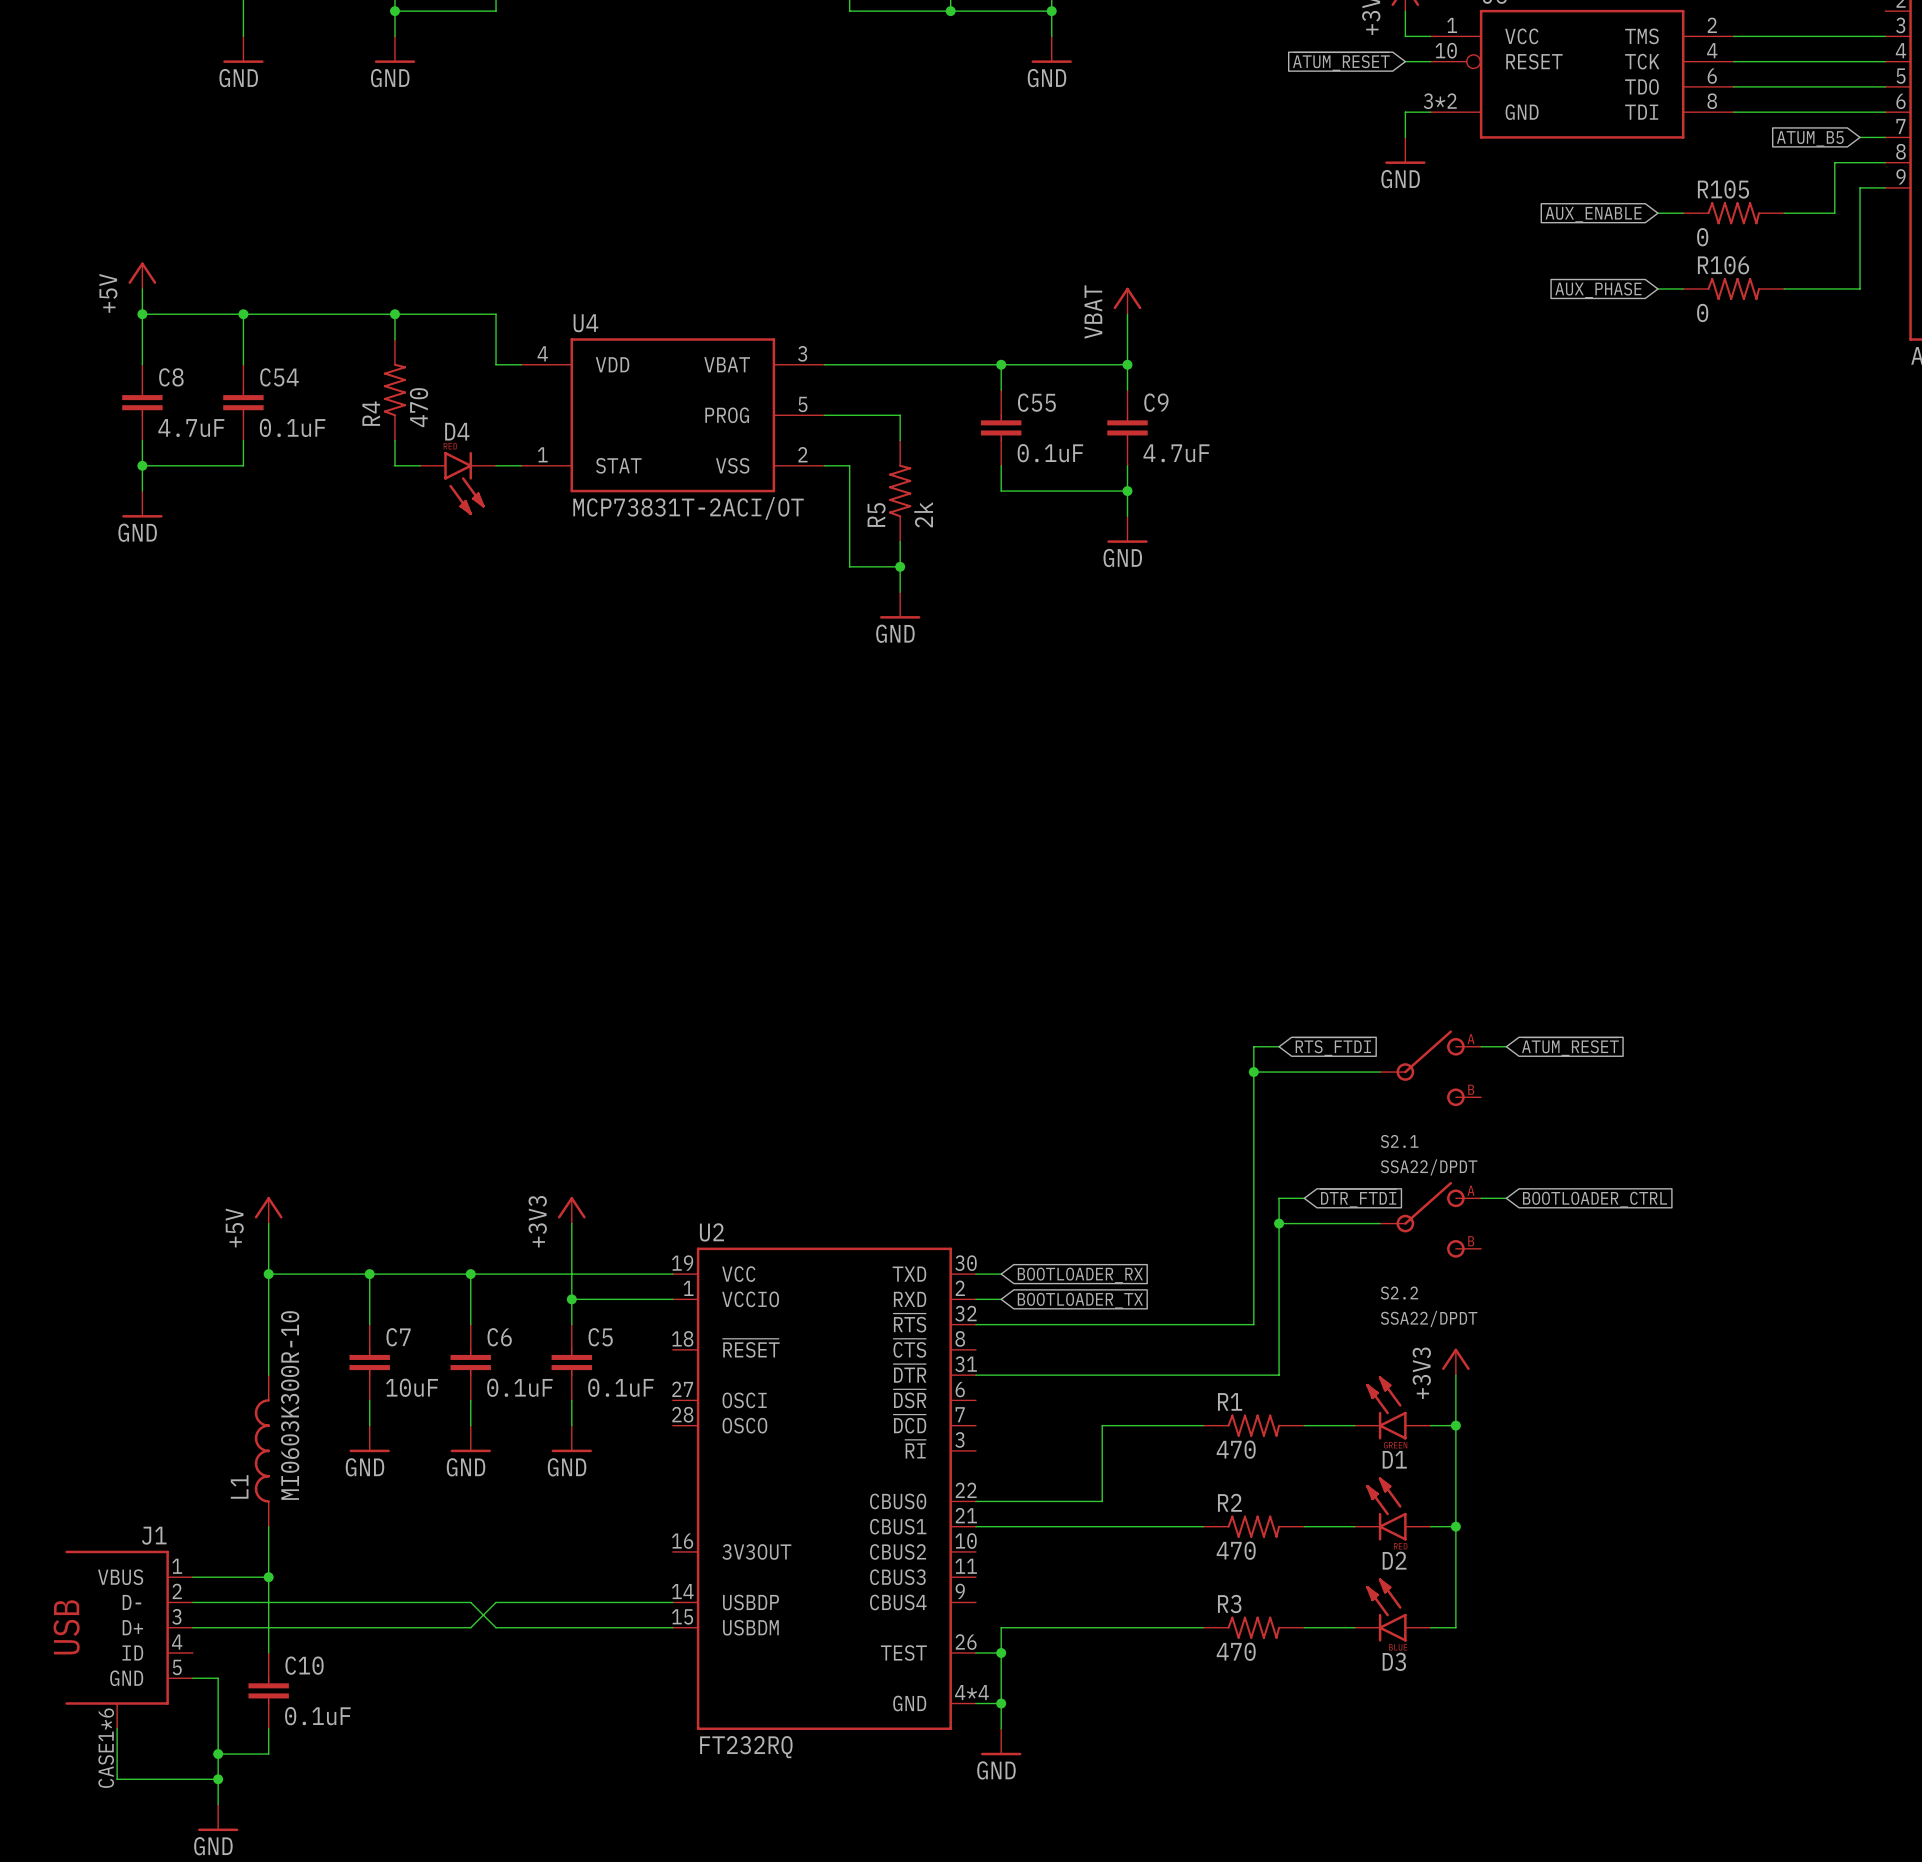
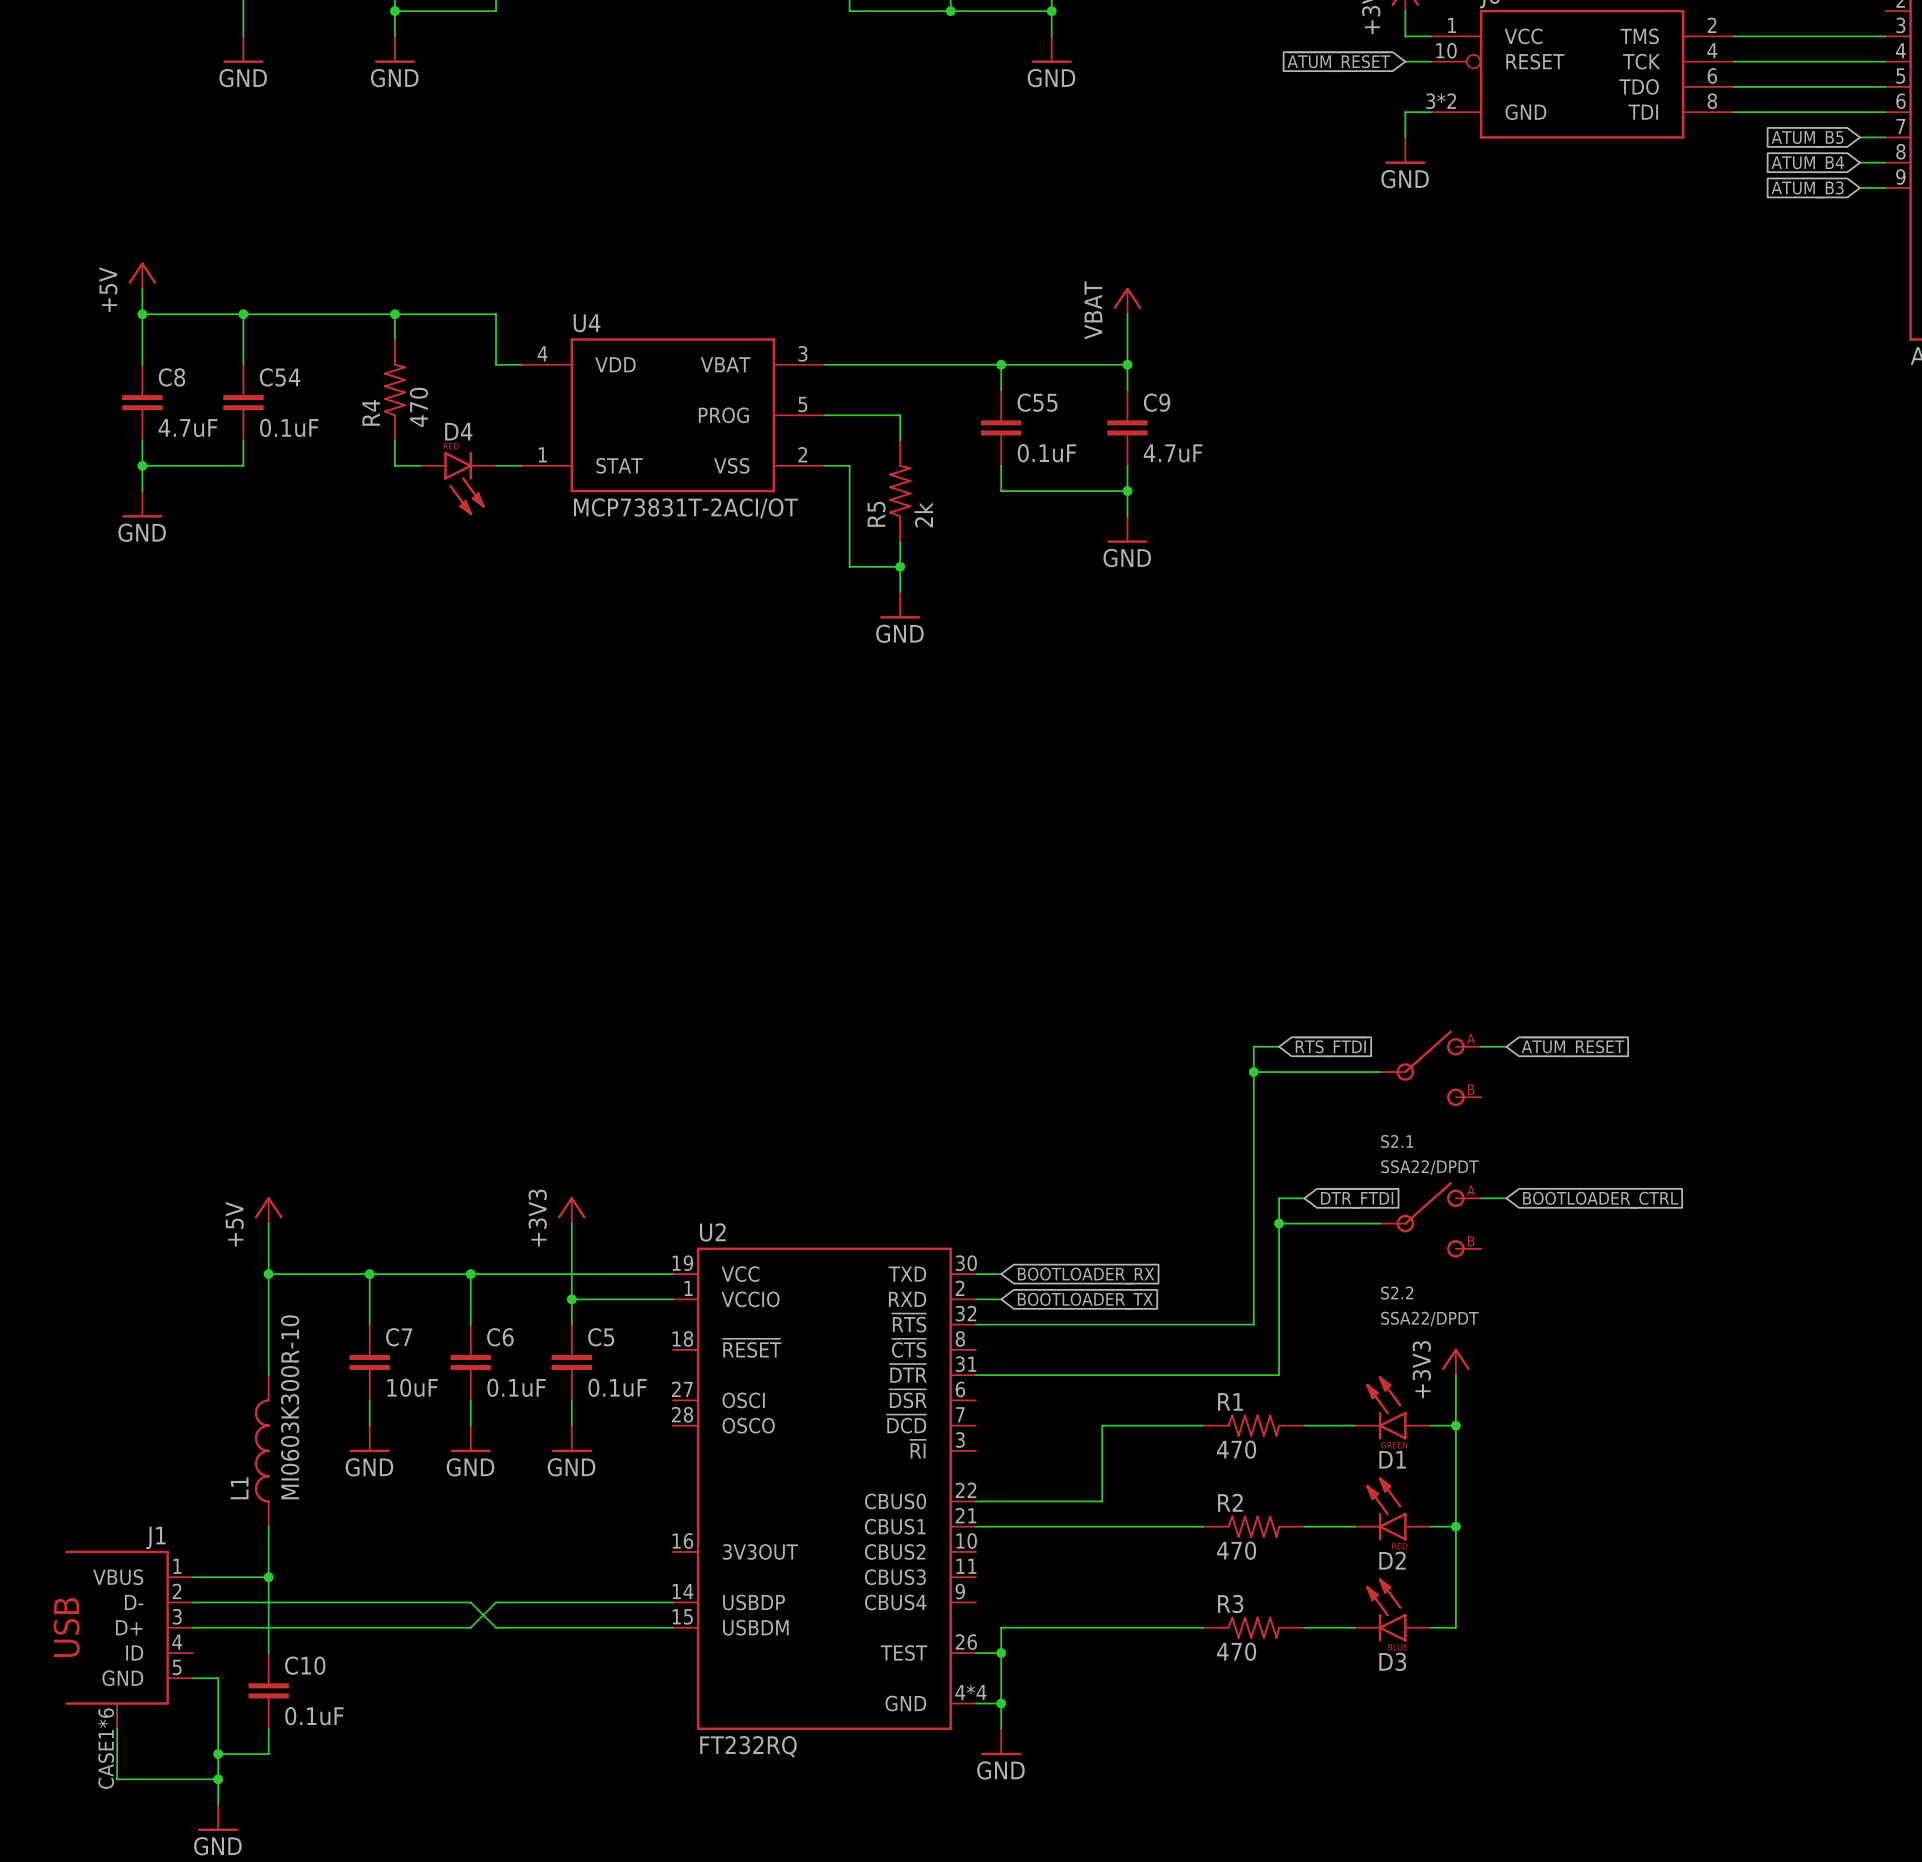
wire: (1860, 162) (1834, 162) (1834, 213) (1784, 213) -> none
global label: none -> ATUM_B4 (1807, 164)
wire: (1860, 187) (1860, 288) (1784, 288) -> none
global label: none -> ATUM_B3 (1807, 189)
wire: (1657, 213) (1683, 213) -> none
R105: 0 (1733, 213) -> none
global label: AUX_ENABLE (1593, 214) -> none
wire: (1657, 288) (1683, 288) -> none
R106: 0 (1733, 288) -> none
global label: AUX_PHASE (1598, 290) -> none

